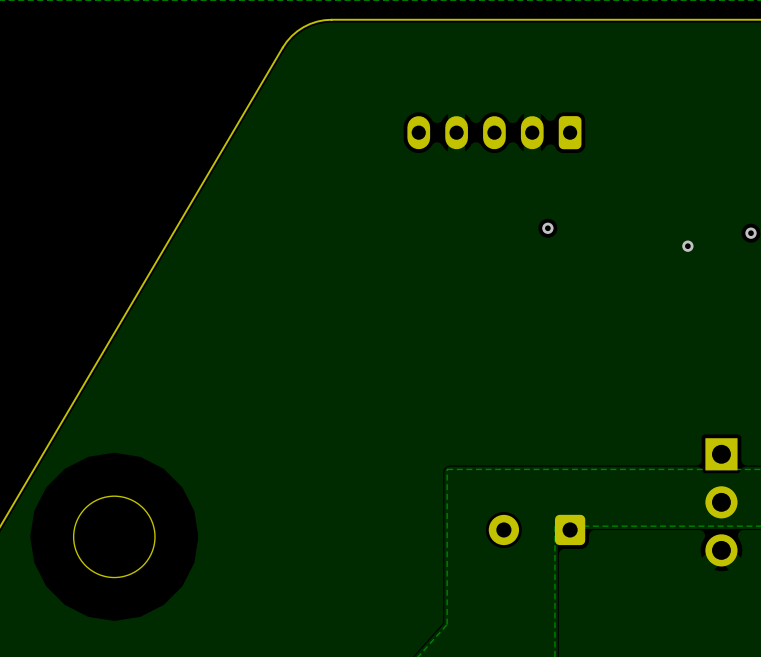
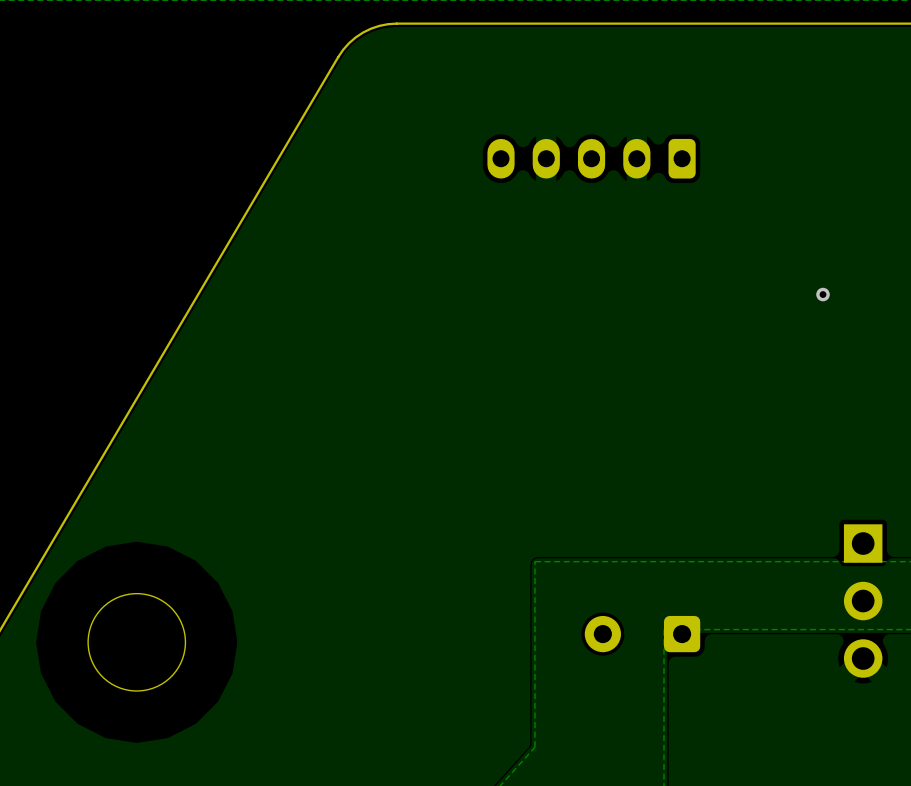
via: (547, 228) -> none
via: (751, 233) -> none

